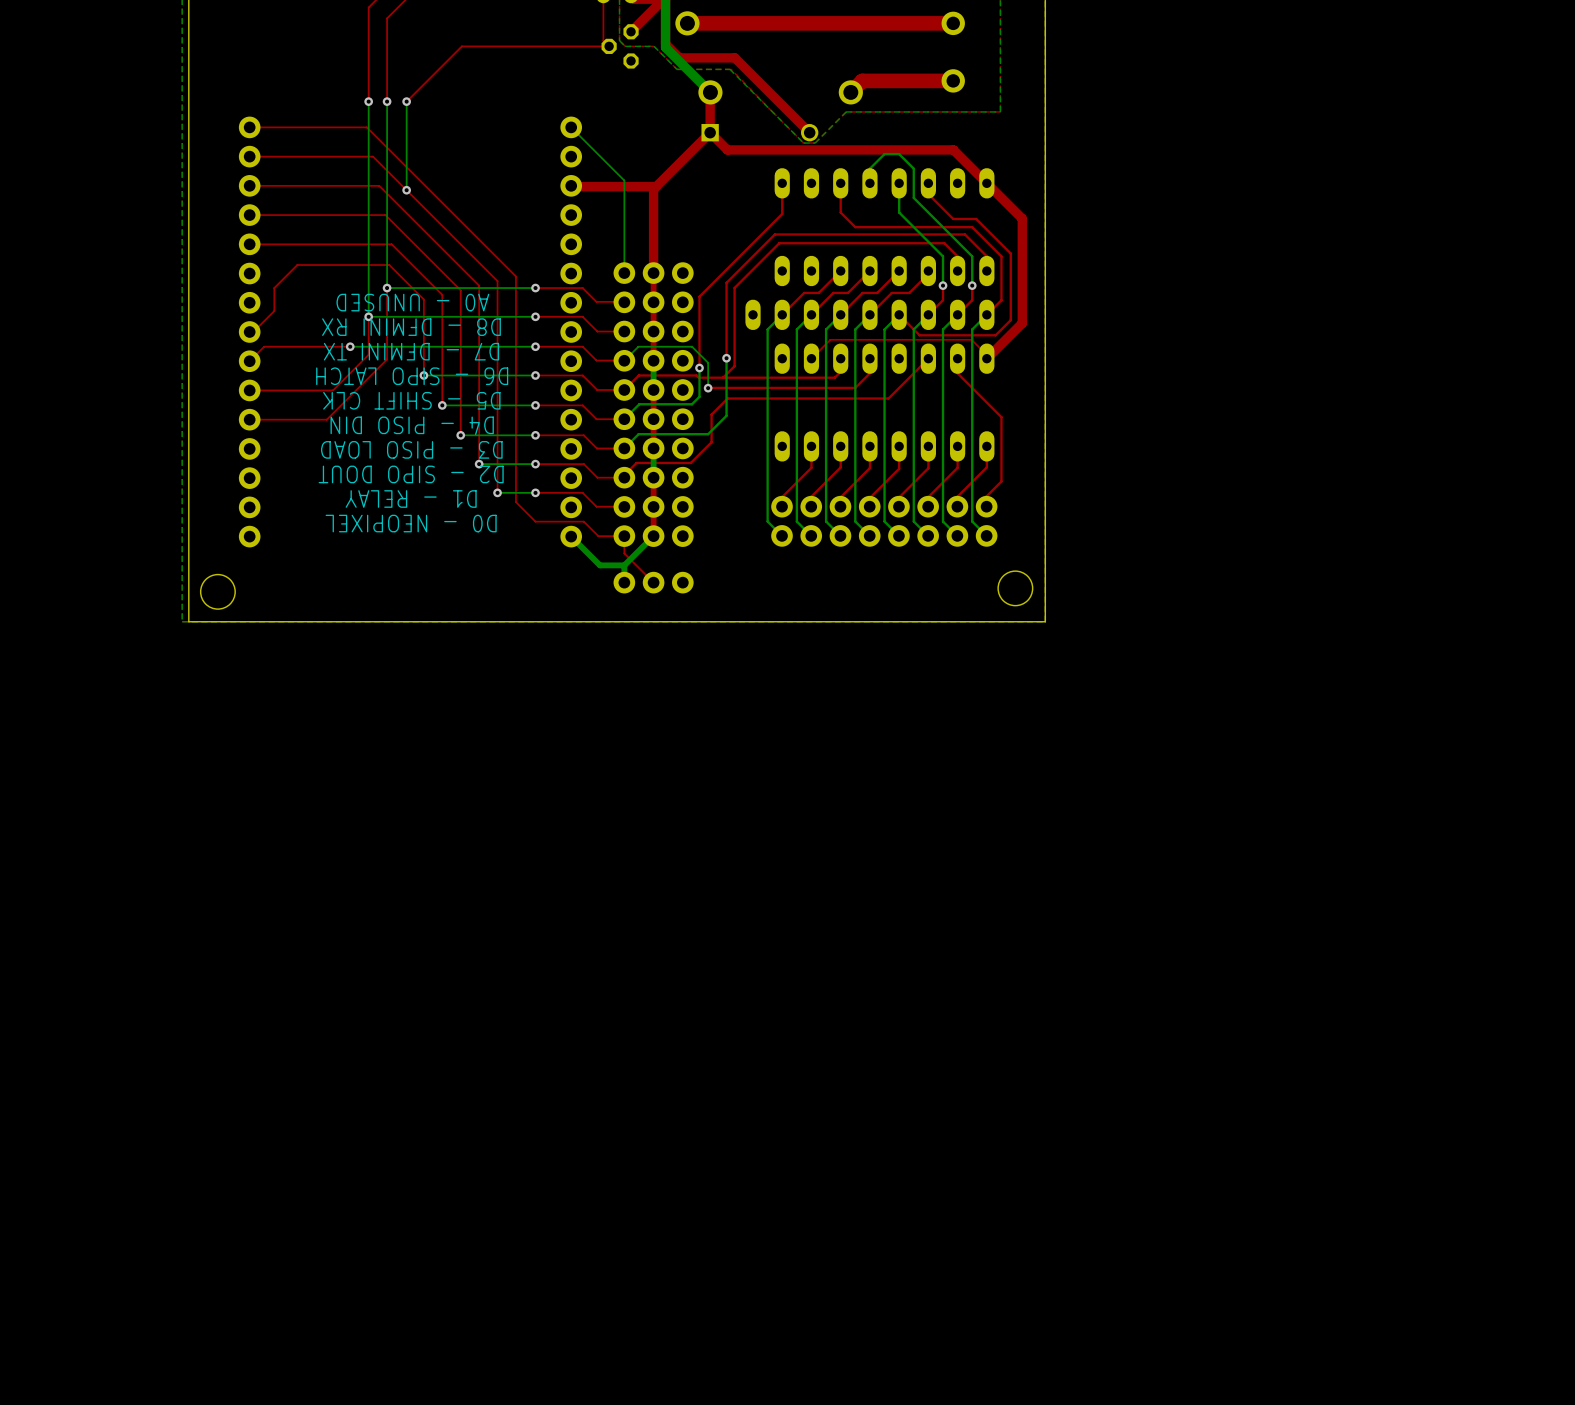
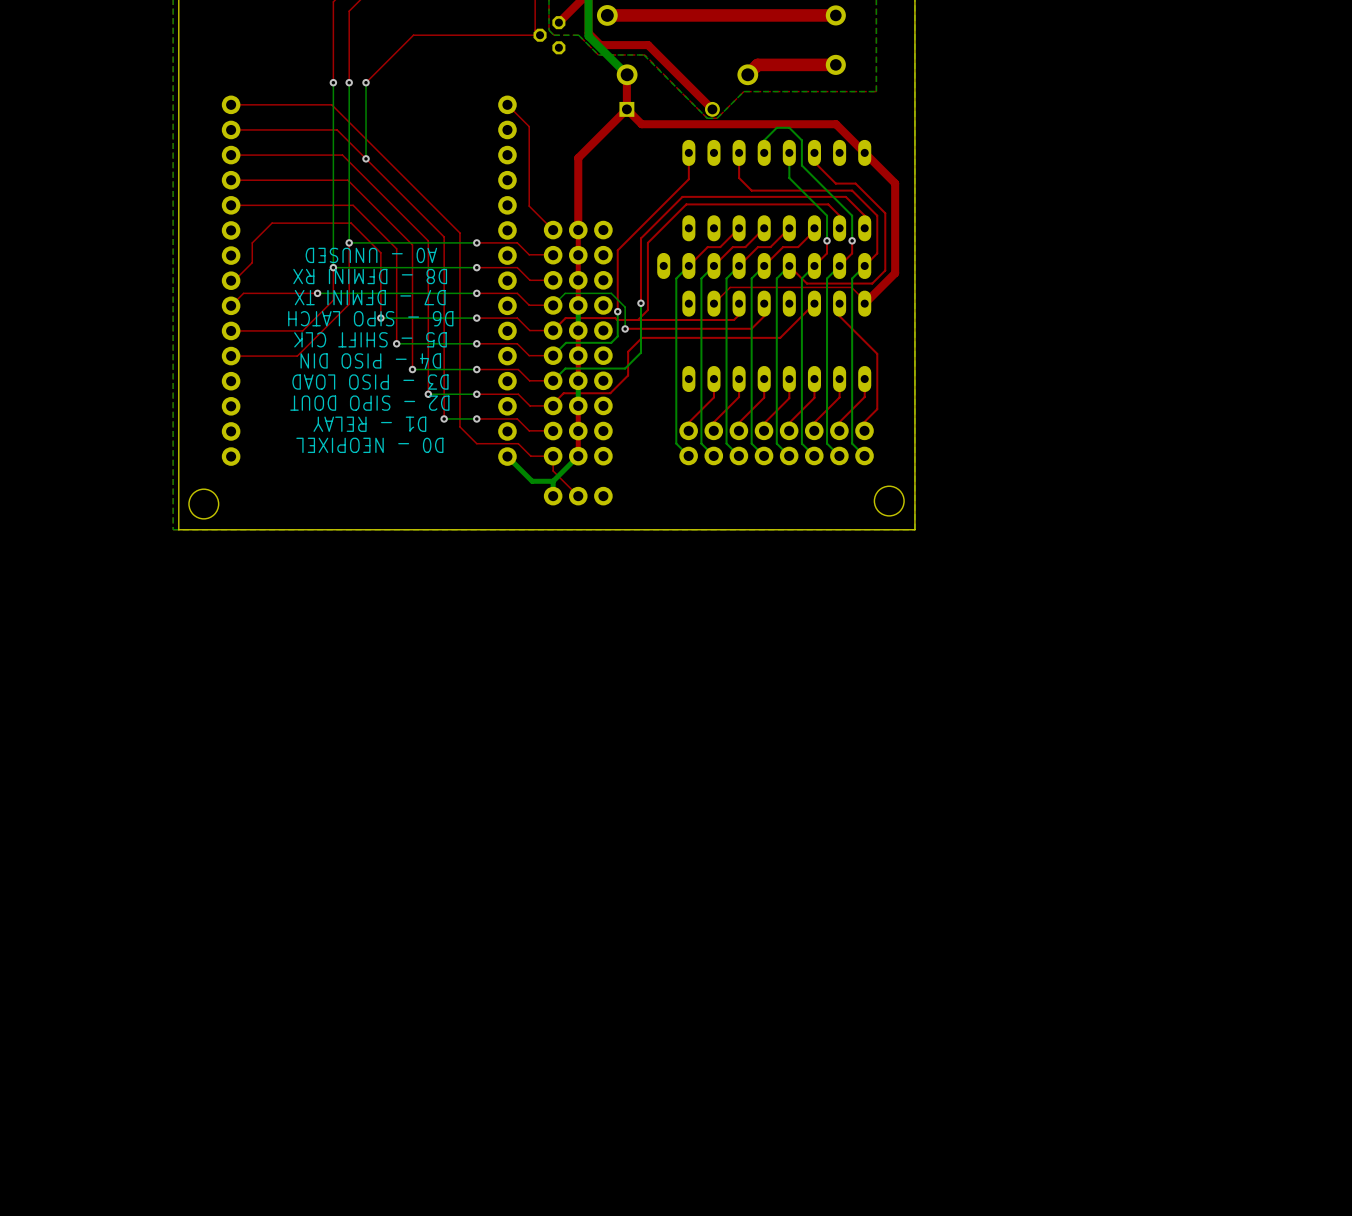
top track: none -> (507, 104) (529, 126) (529, 206) (553, 230)
bottom track: (571, 127) (624, 180) (624, 273) -> none
top track: (571, 185) (656, 186) -> none

